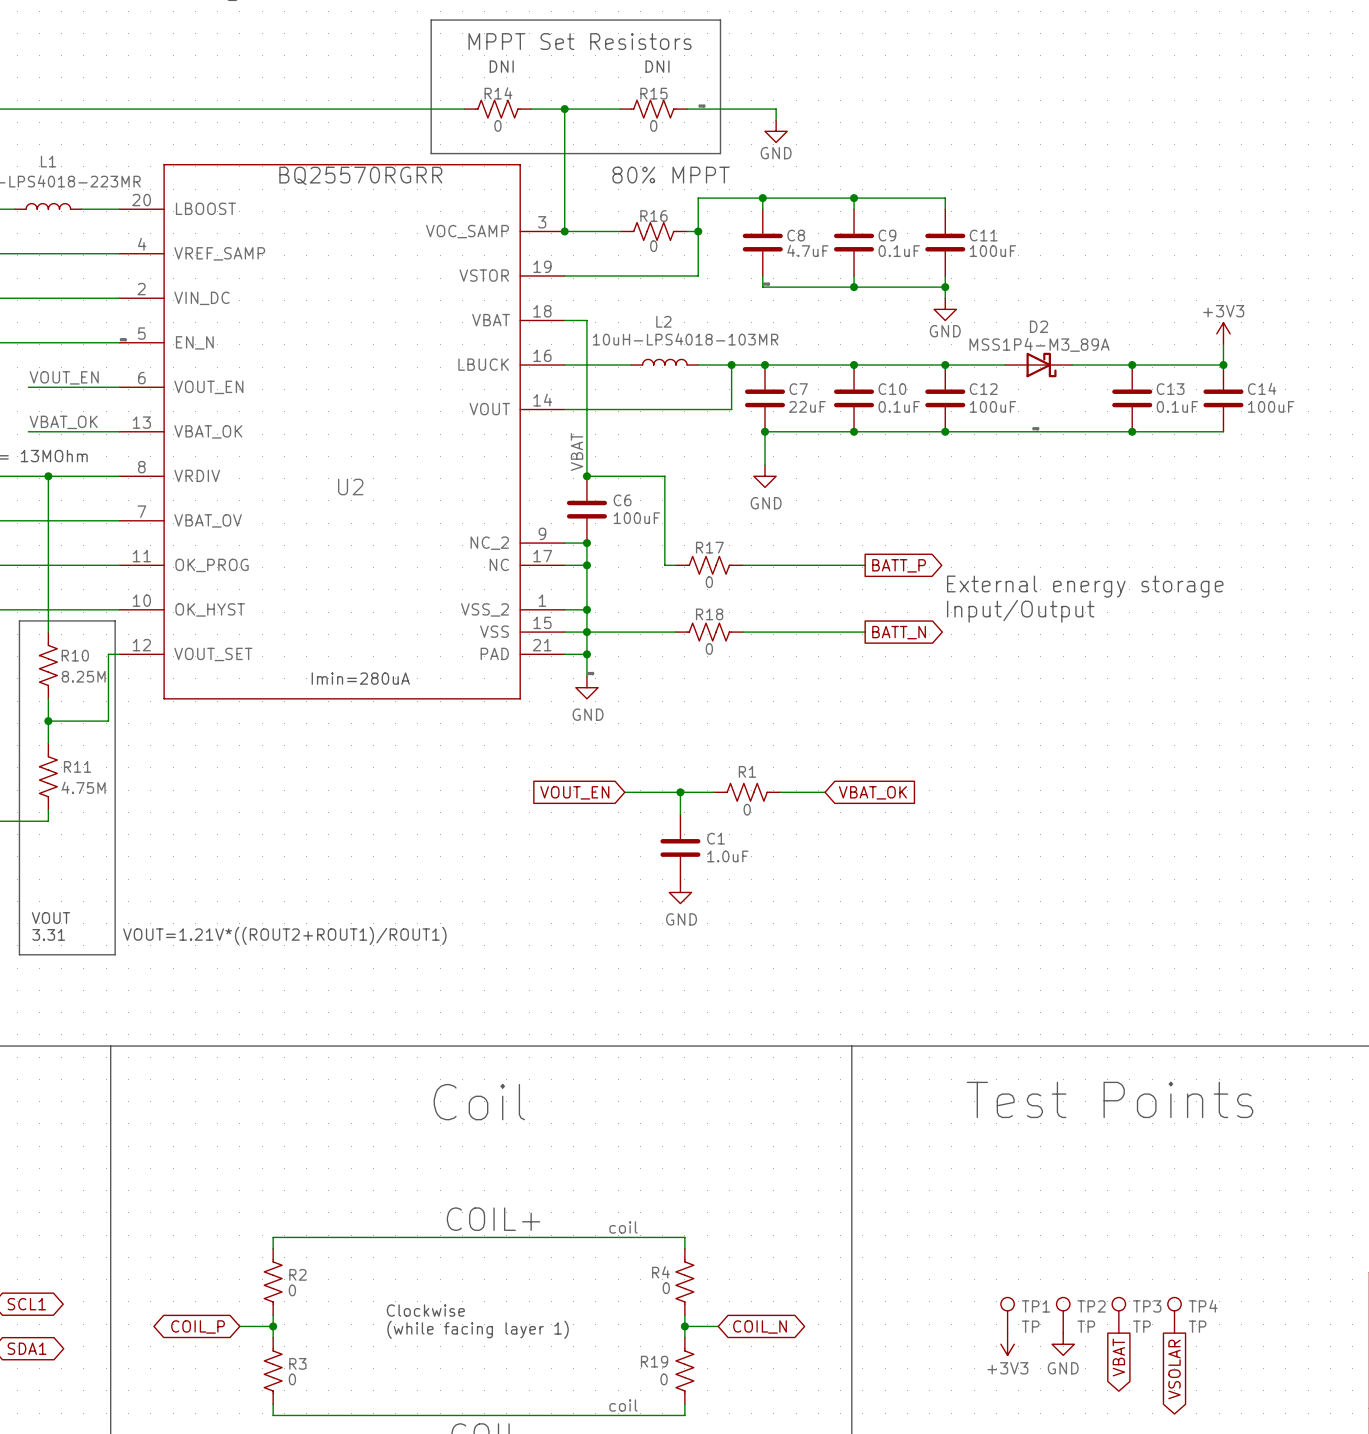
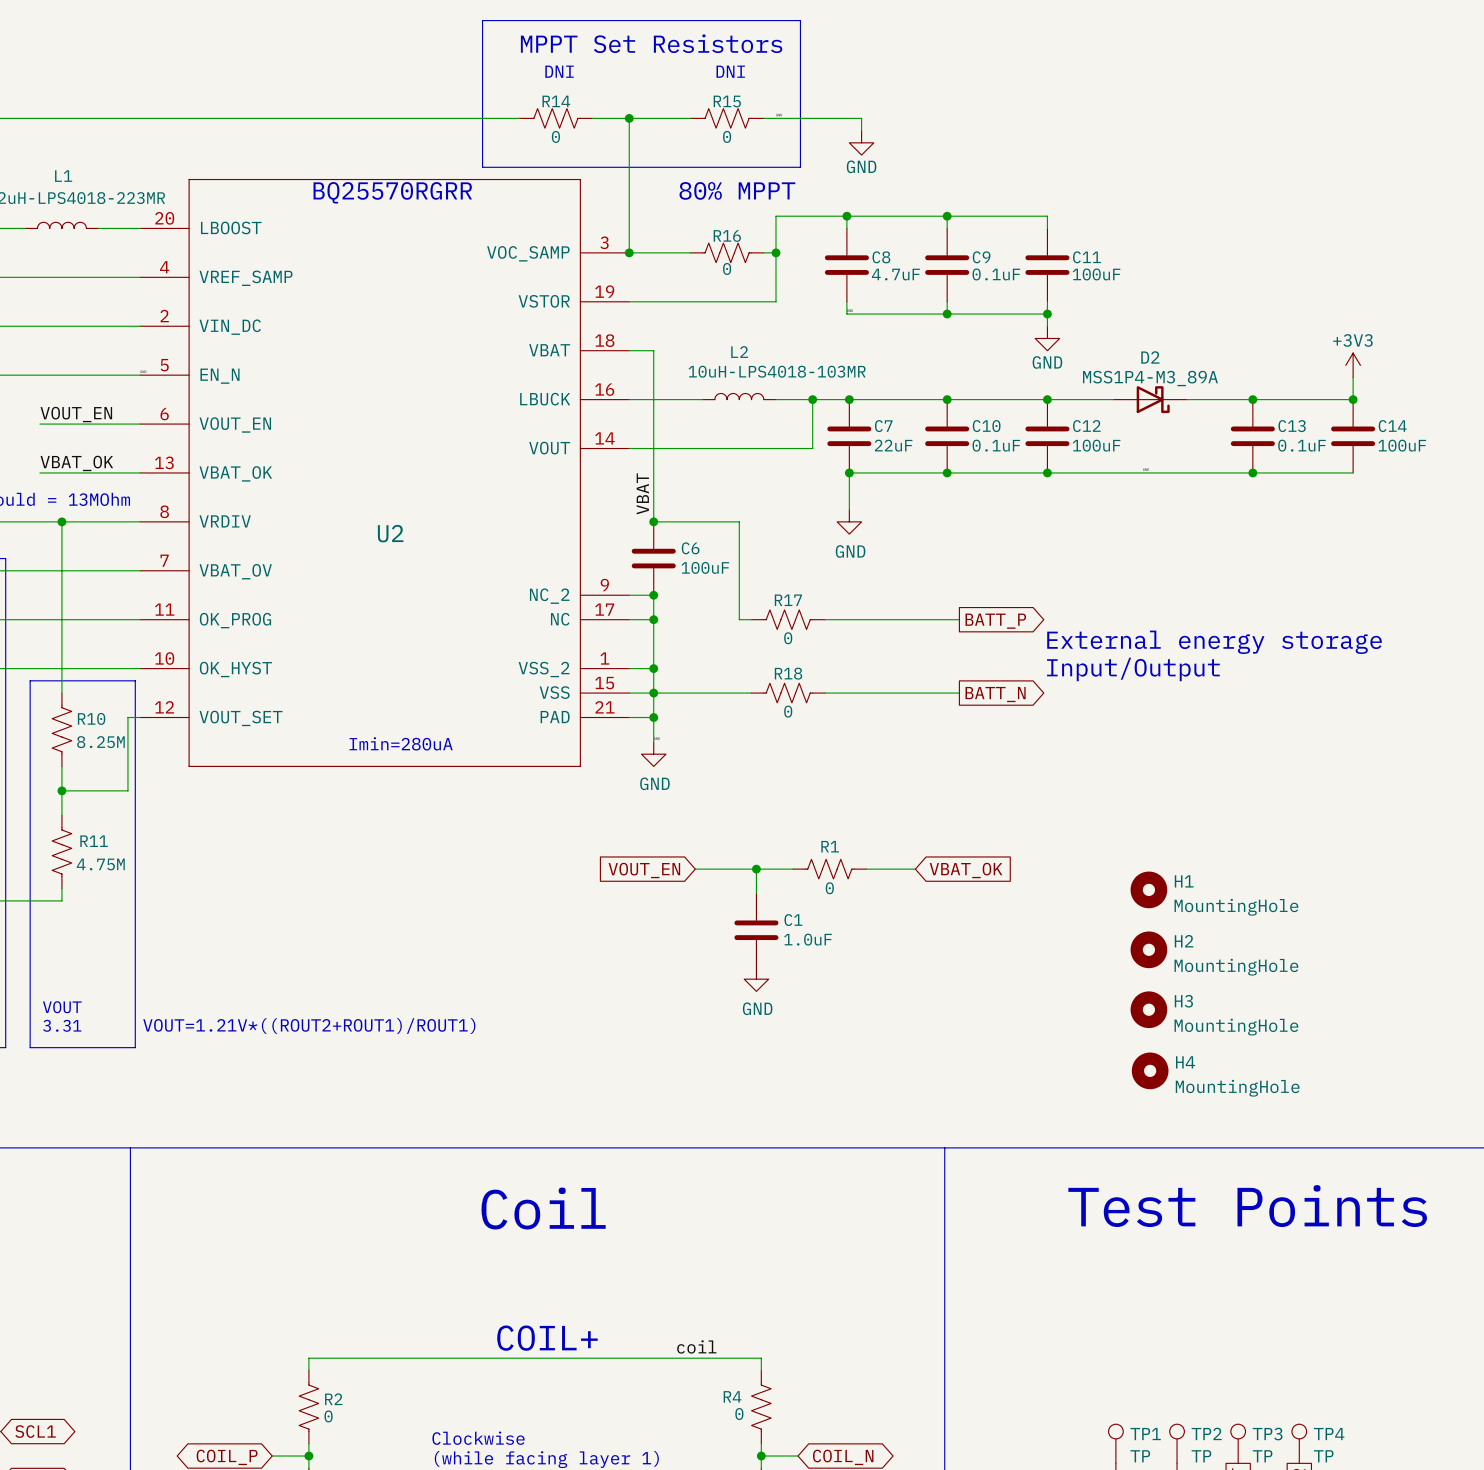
H1: none -> MountingHole (1148, 889)
H2: none -> MountingHole (1148, 949)
H3: none -> MountingHole (1148, 1009)
H4: none -> MountingHole (1150, 1070)

